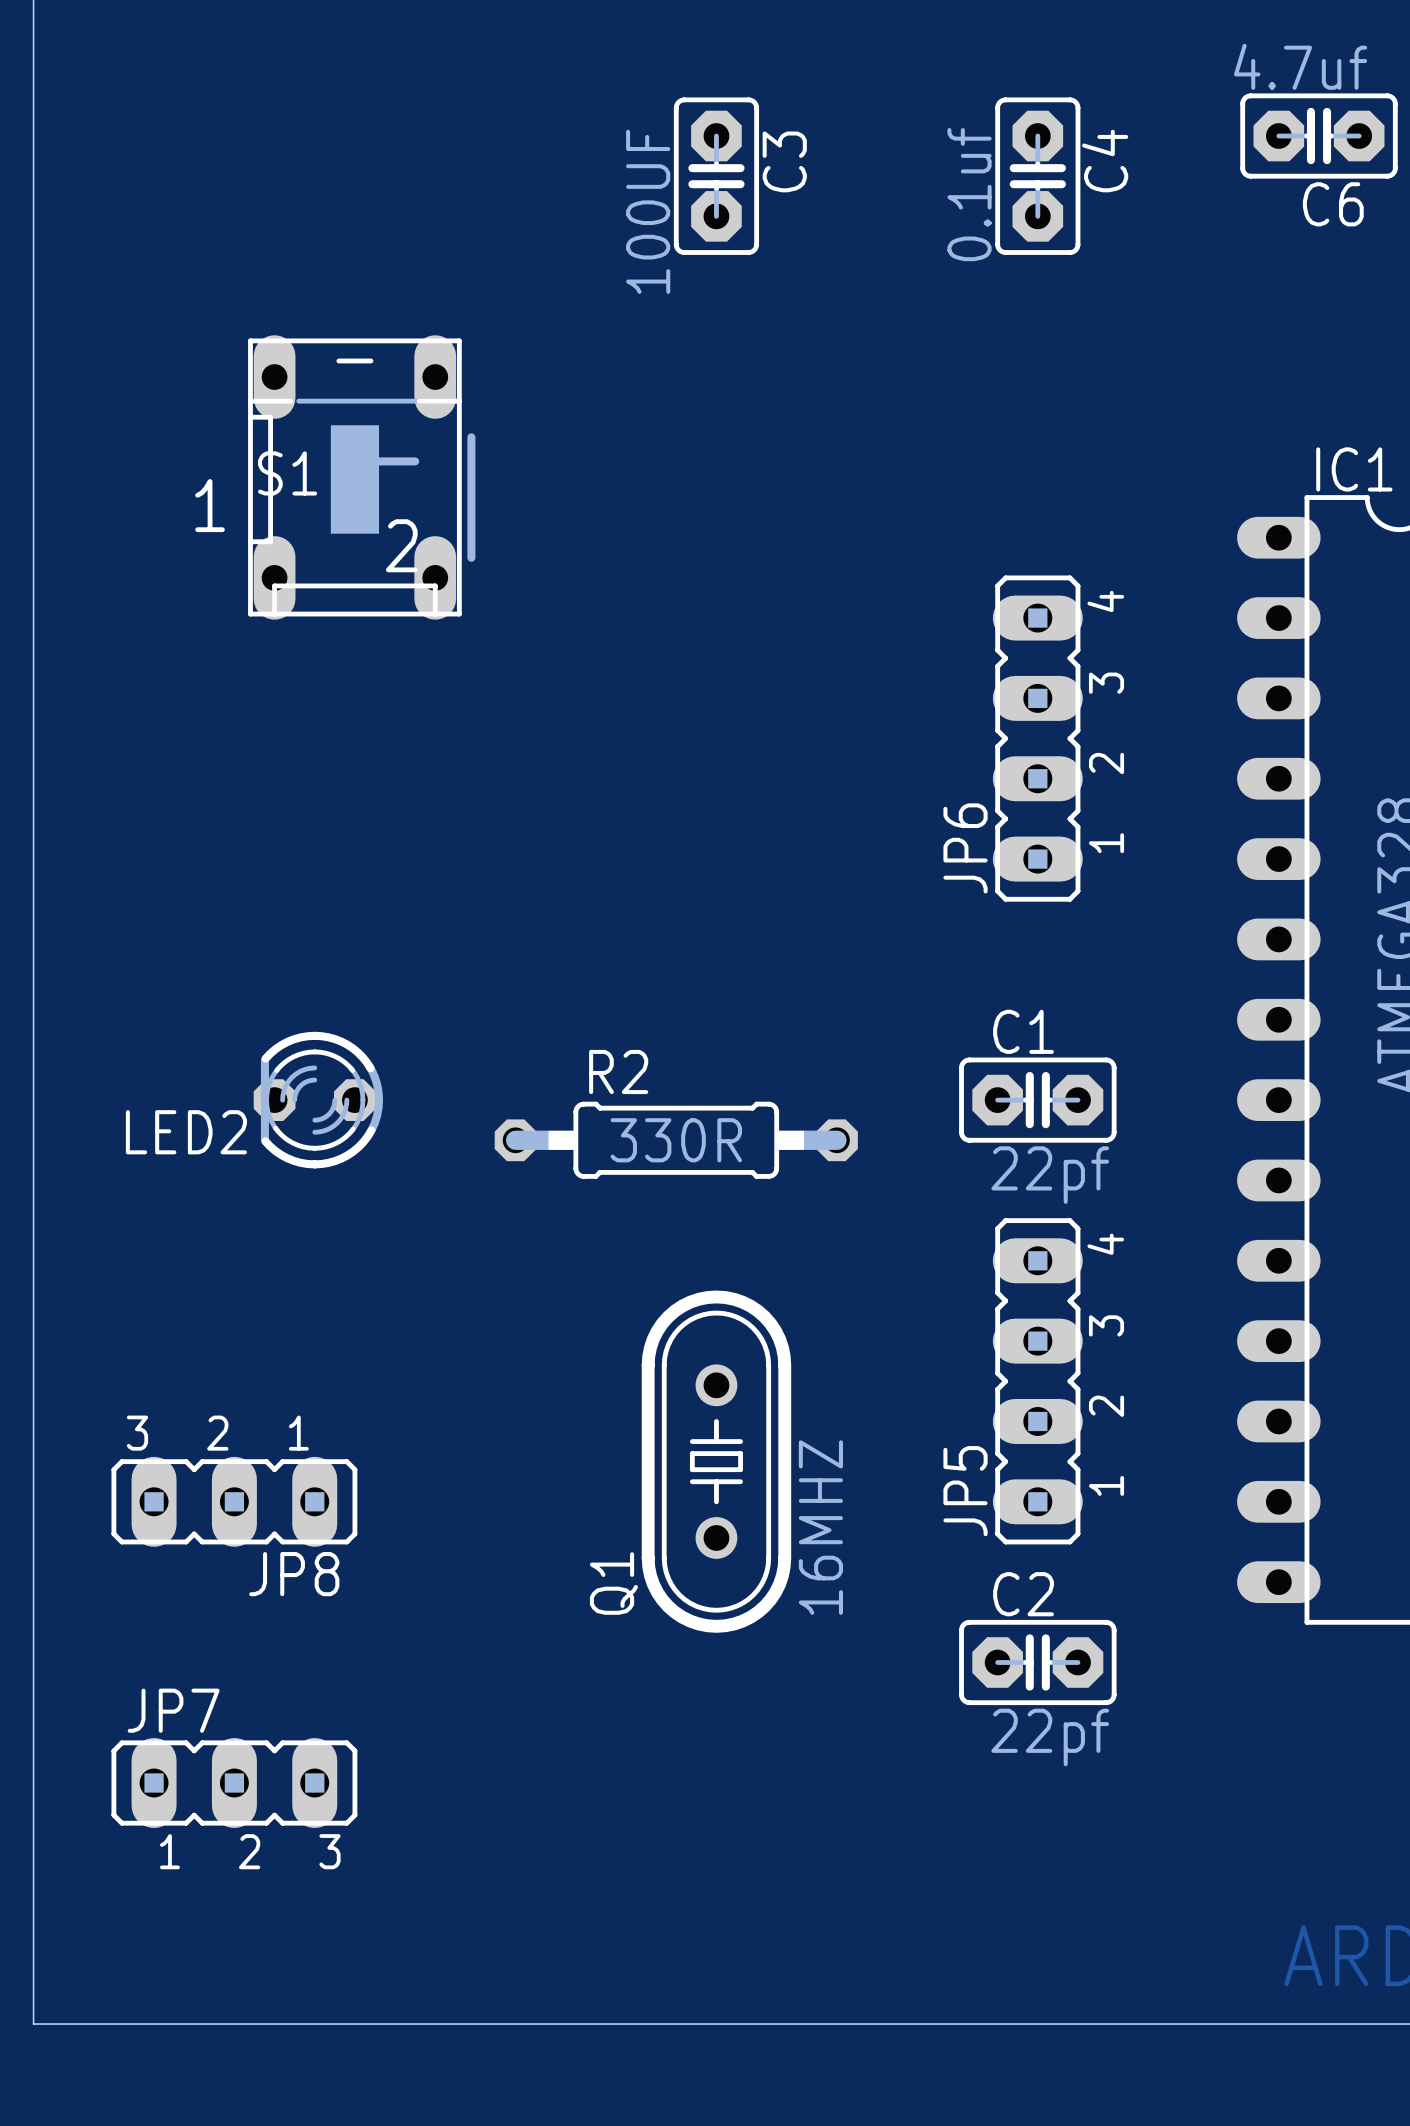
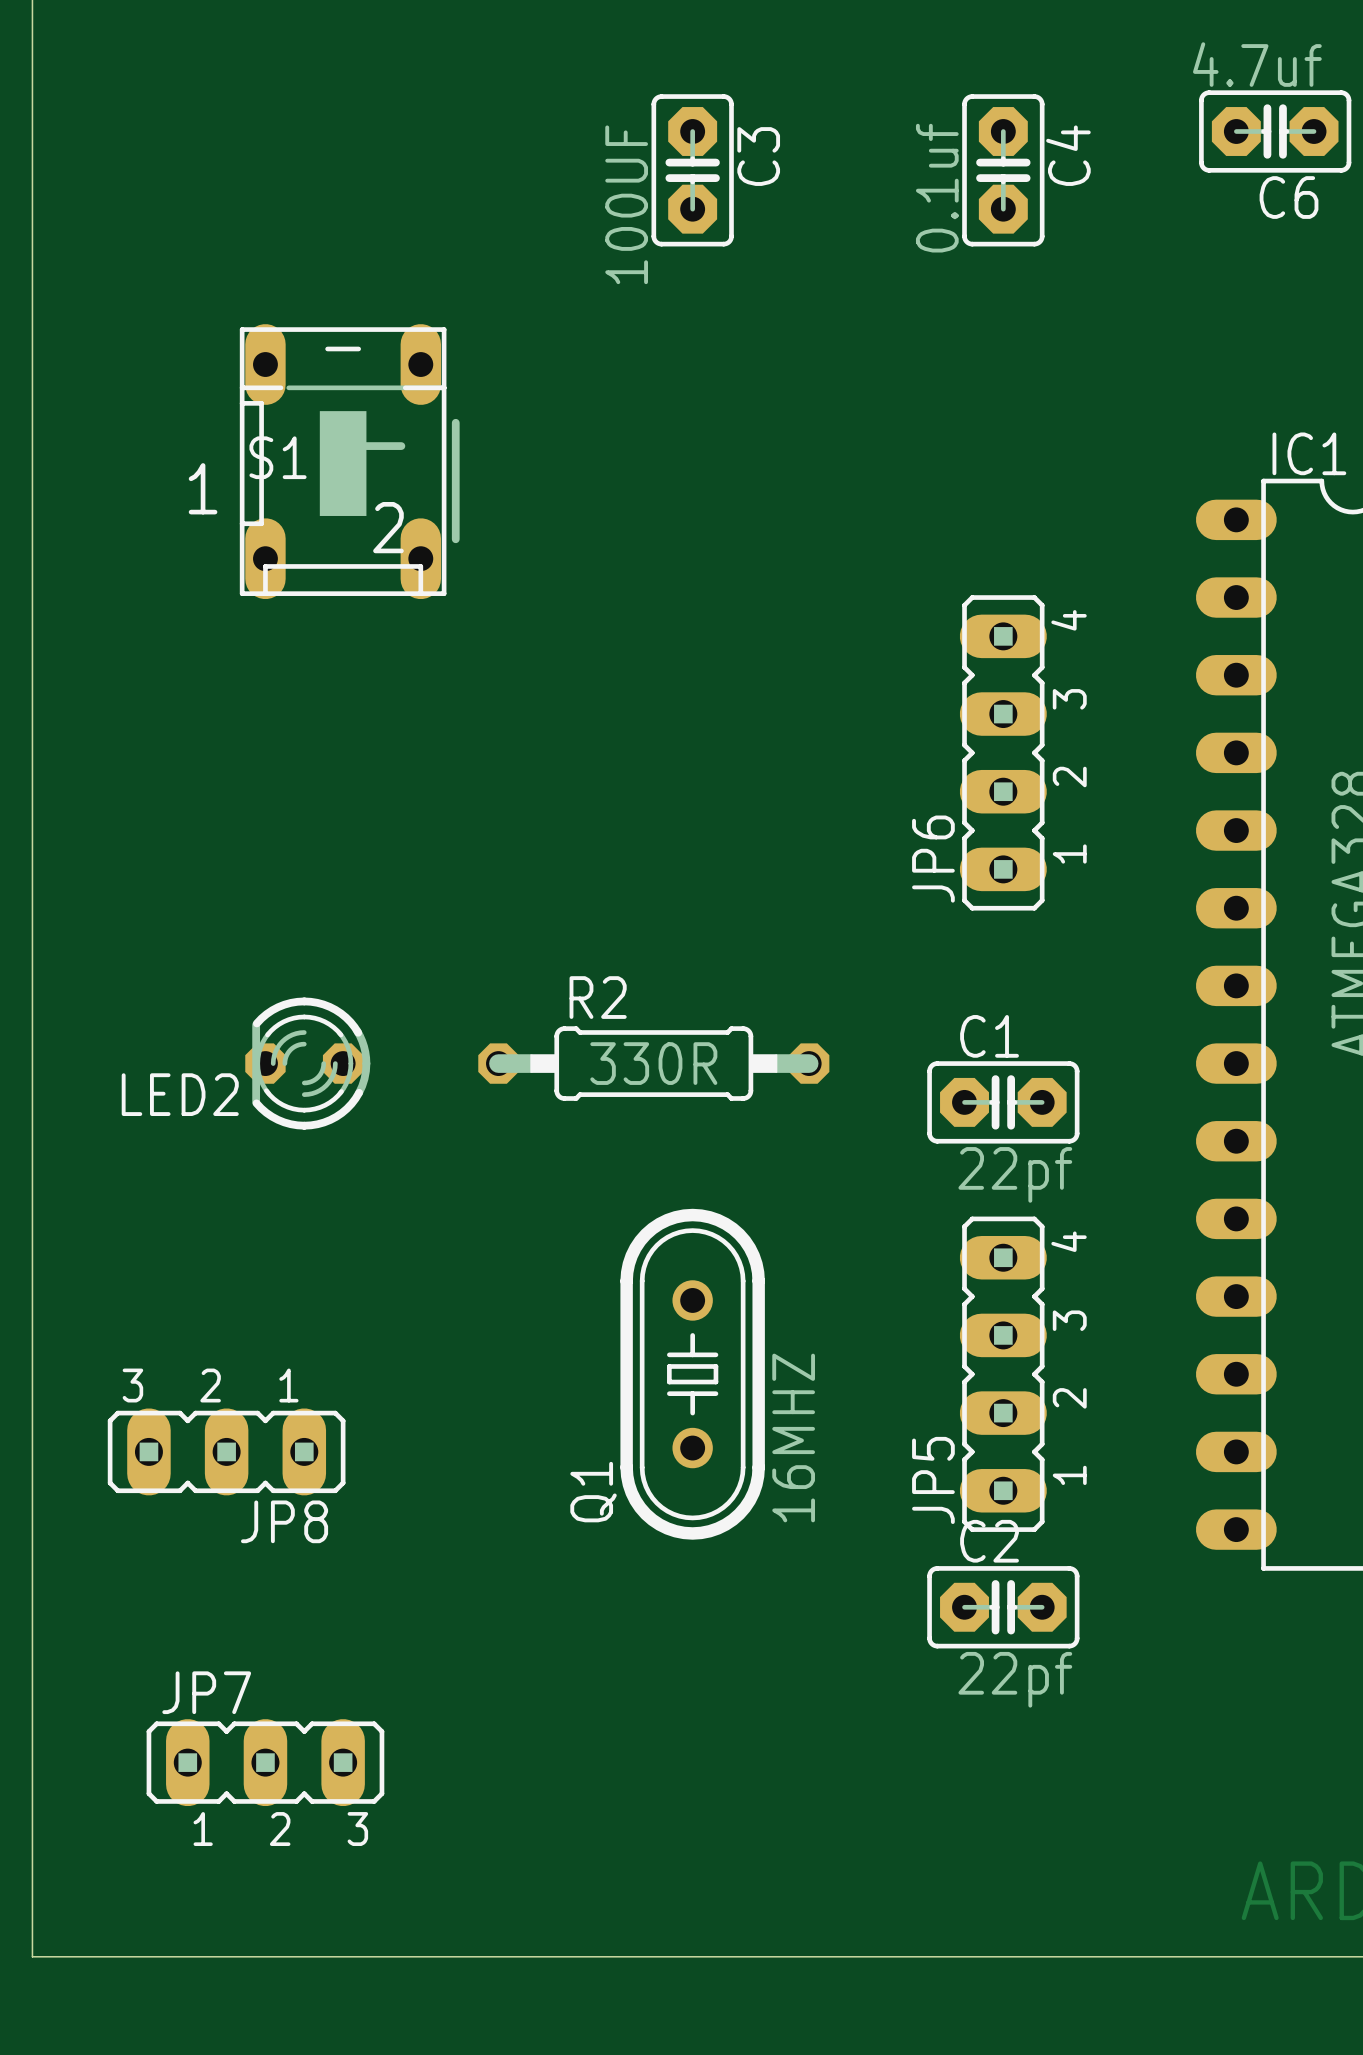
JP6 position: (1037, 738) -> (1003, 752)
C1 position: (1037, 1100) -> (1003, 1102)
R2 position: (676, 1140) -> (653, 1063)
JP5 position: (1037, 1381) -> (1003, 1374)
Q1 position: (716, 1461) -> (692, 1374)
JP7 position: (234, 1783) -> (265, 1762)

